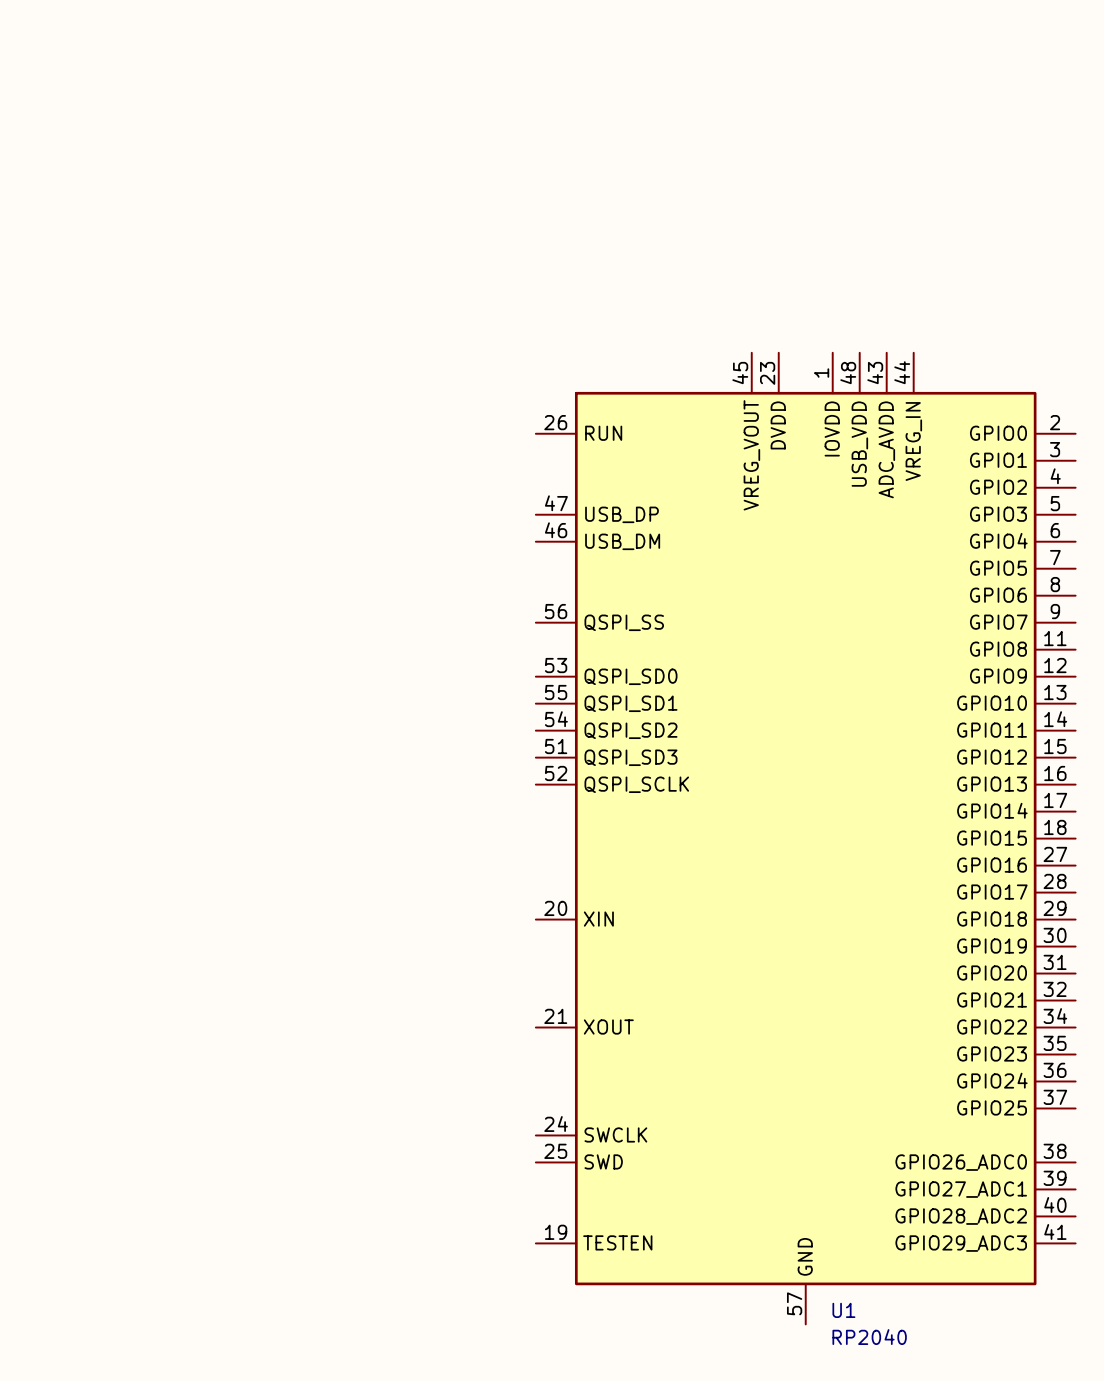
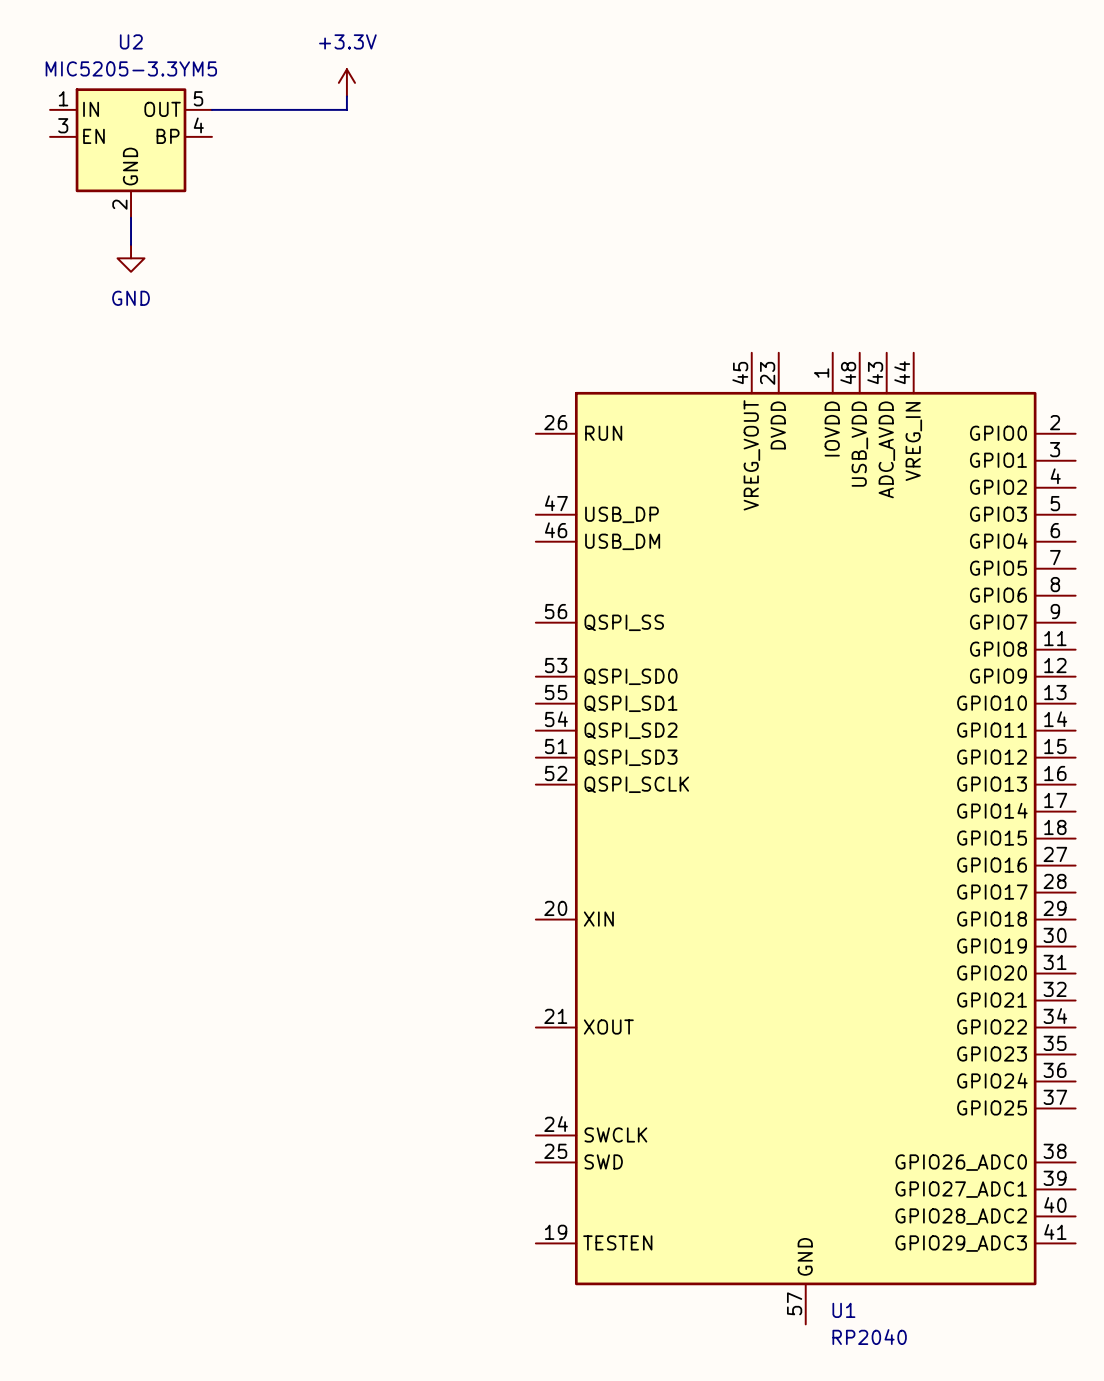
power symbol: none -> +3.3V (346, 82)
wire: none -> (346, 96) (346, 109) (211, 109)
U2: none -> MIC5205-3.3YM5 (131, 153)
wire: none -> (131, 217) (131, 244)
power symbol: none -> GND (131, 258)

